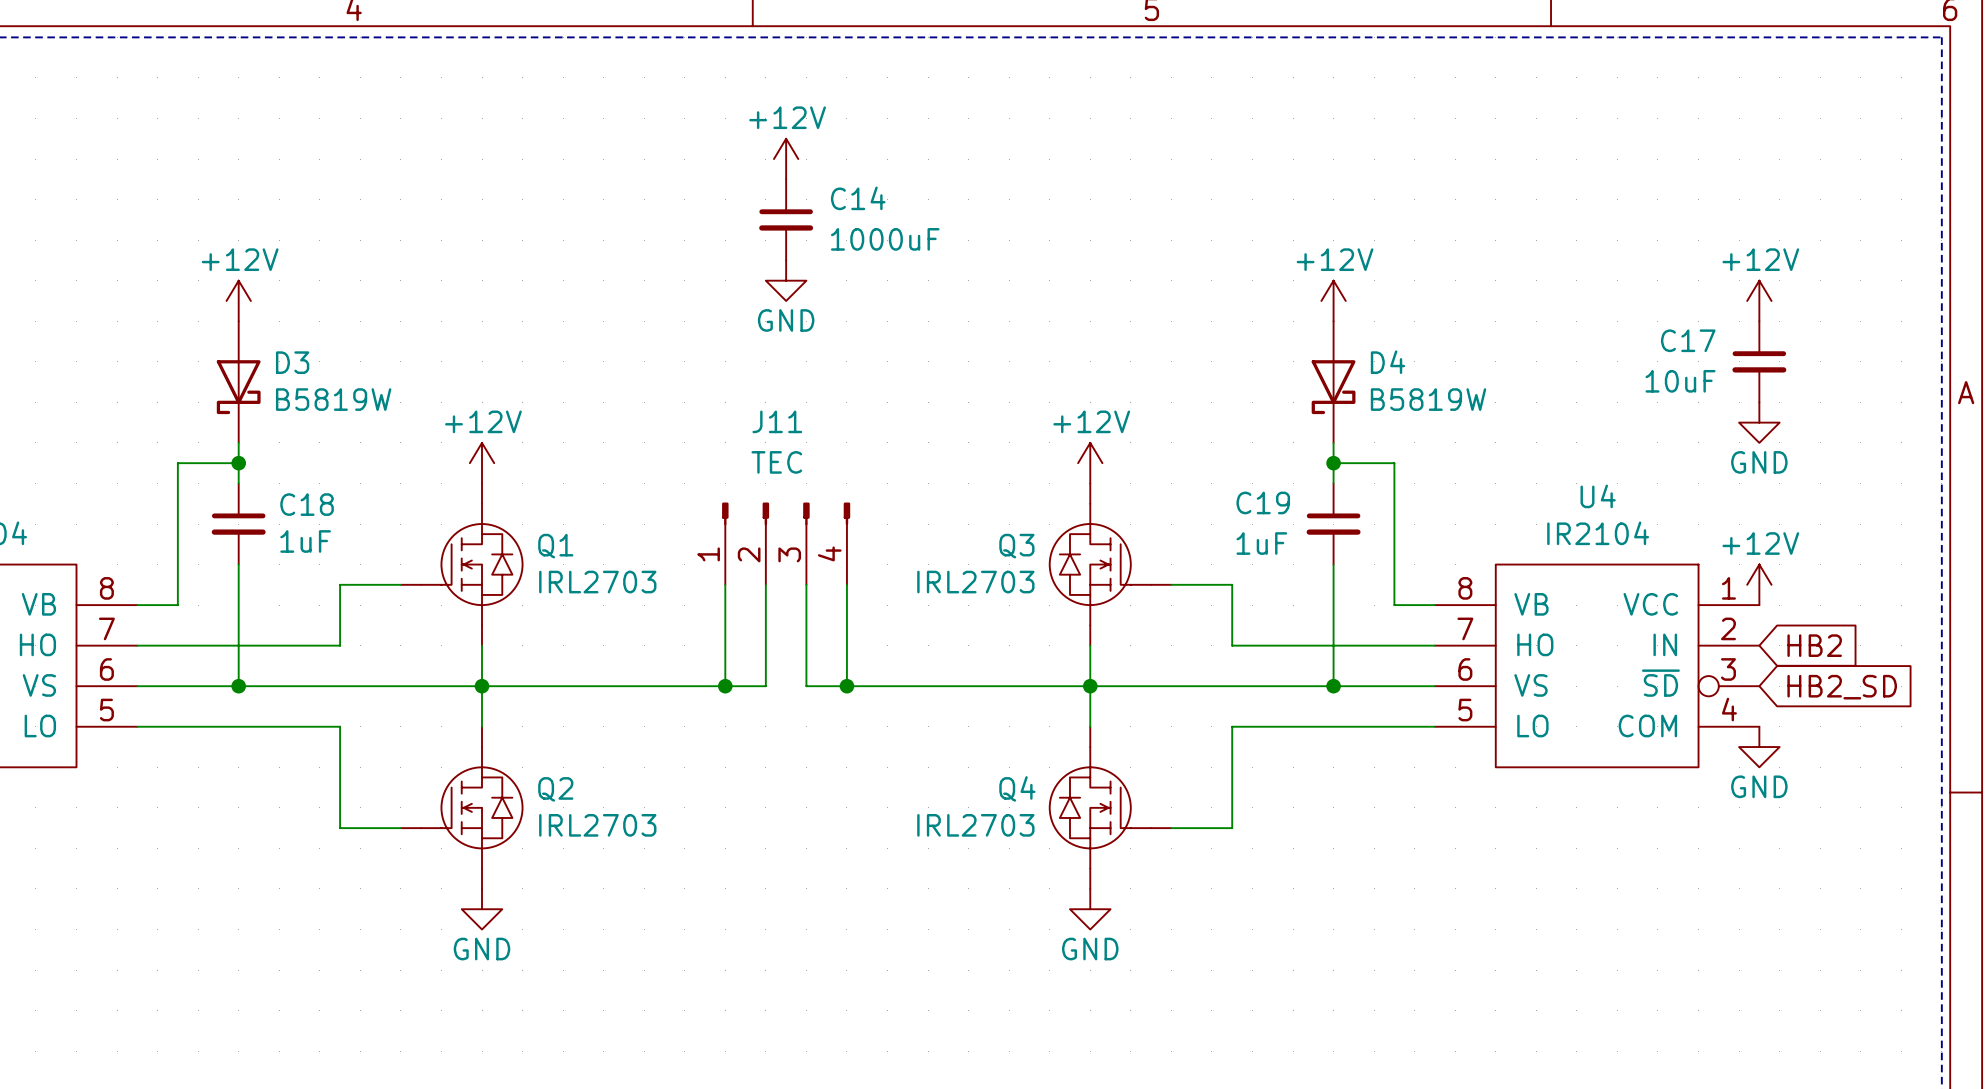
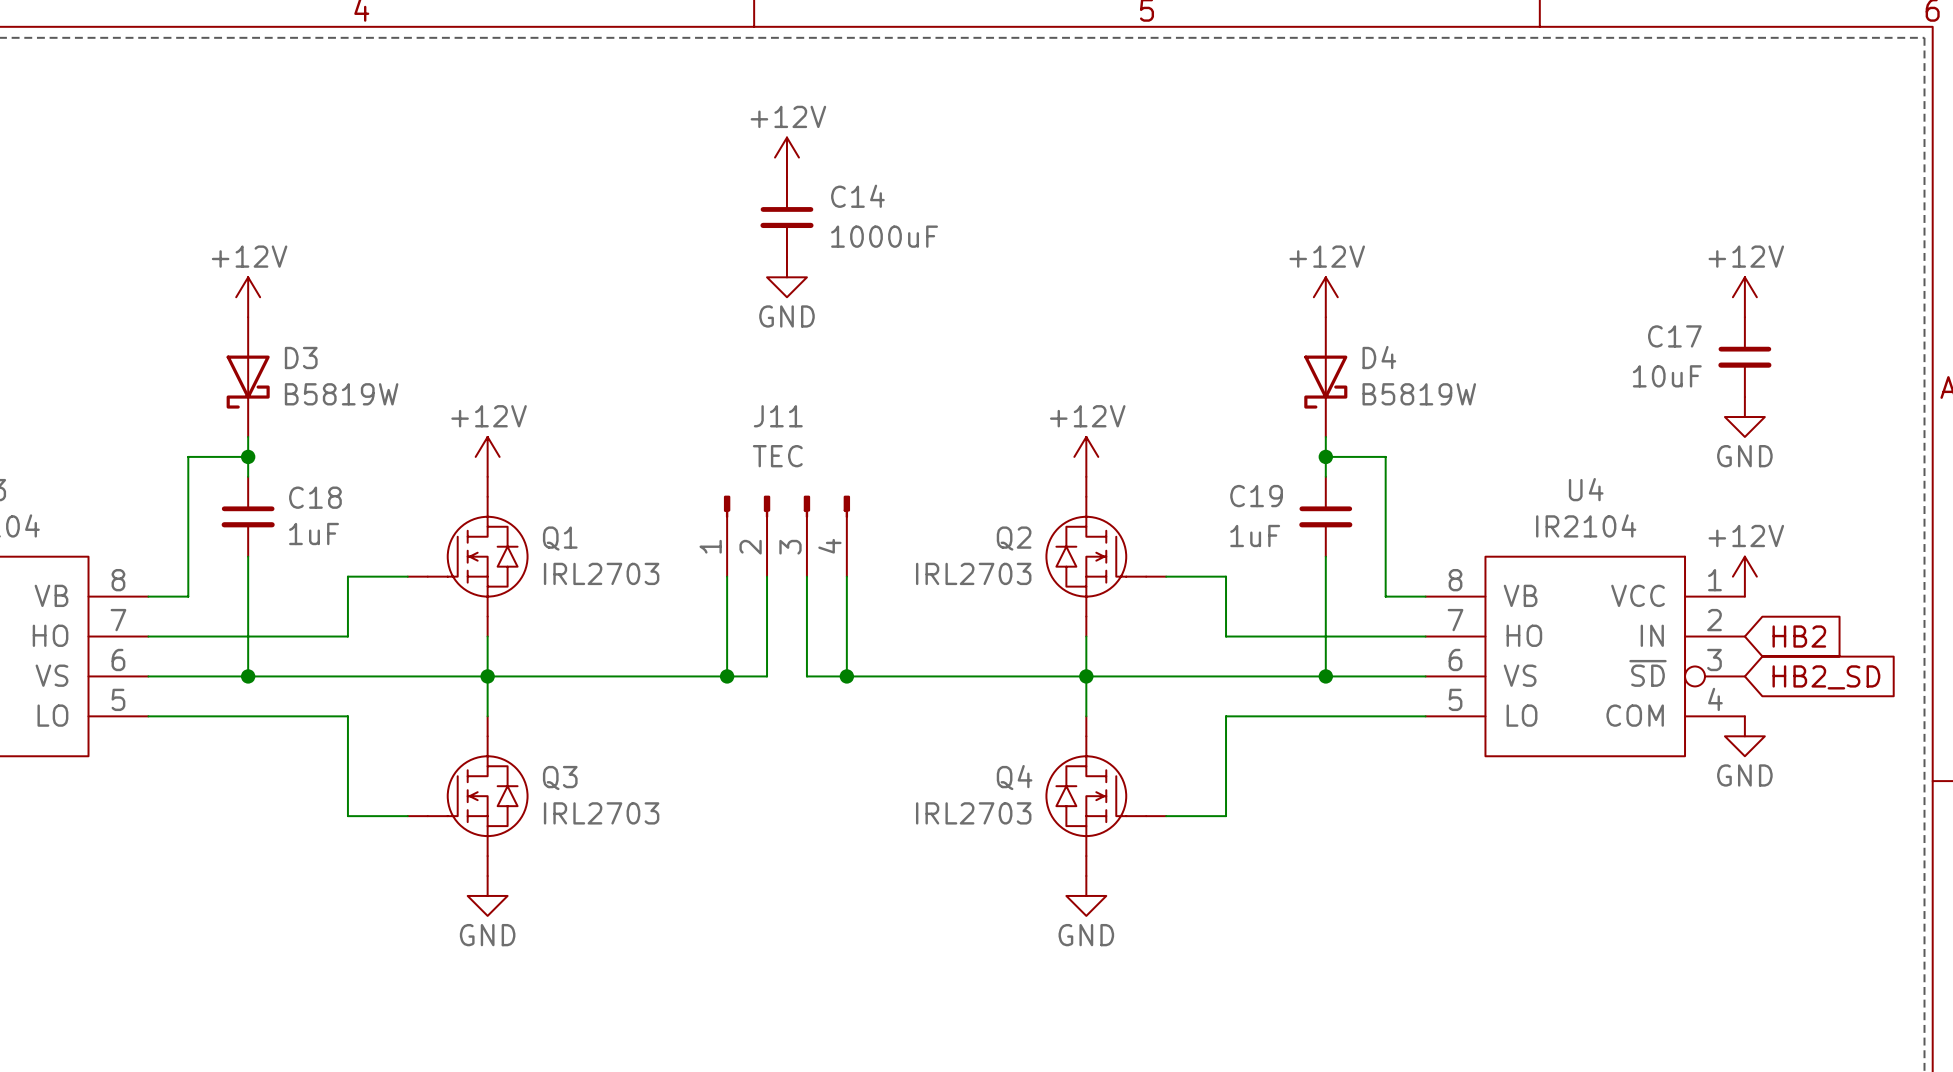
Q3 name: Q3 (1016, 546) -> Q2 (1014, 538)
Q2 name: Q2 (555, 789) -> Q3 (560, 778)

